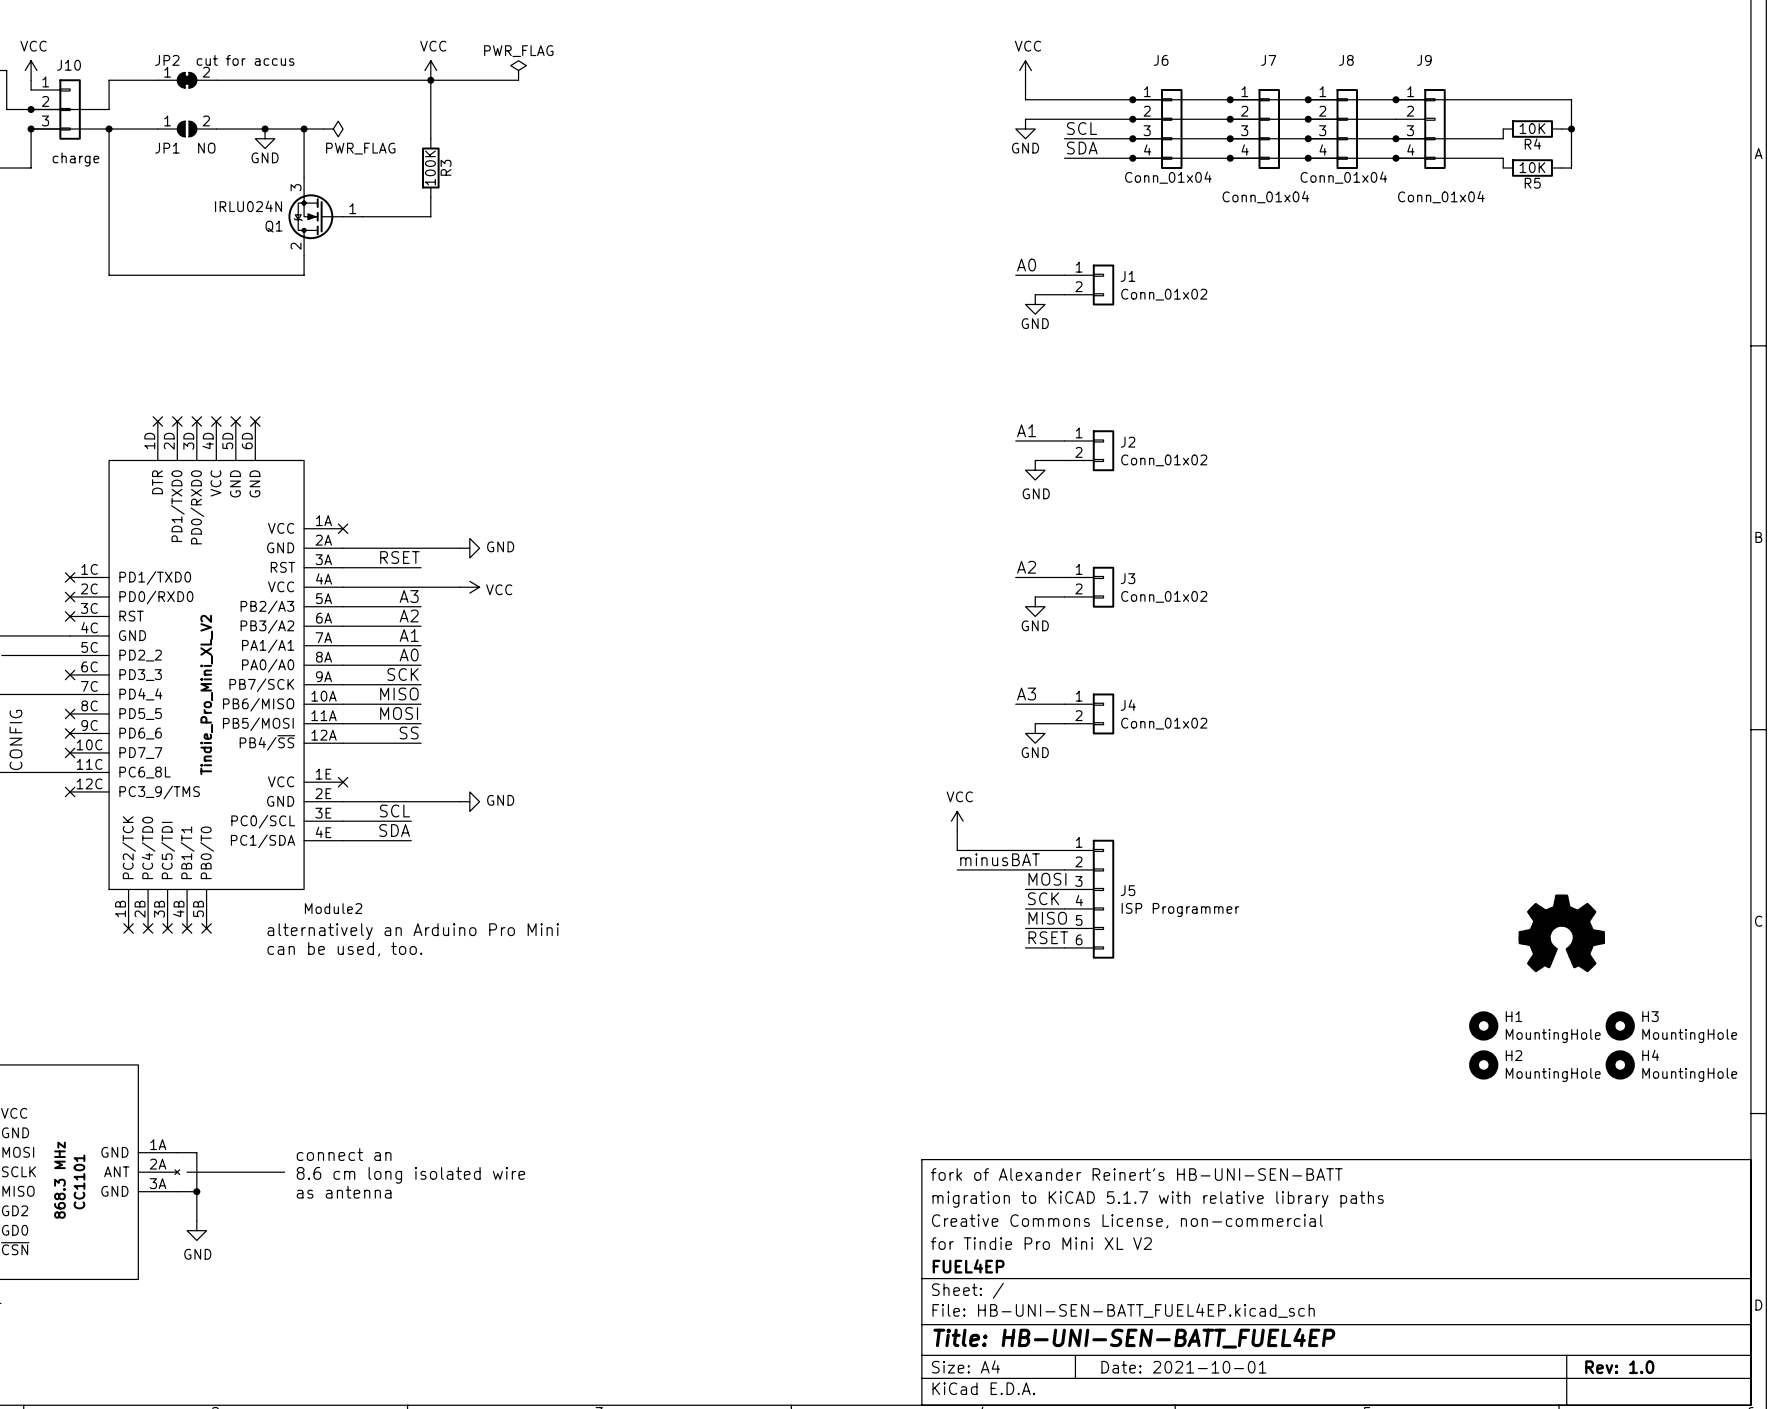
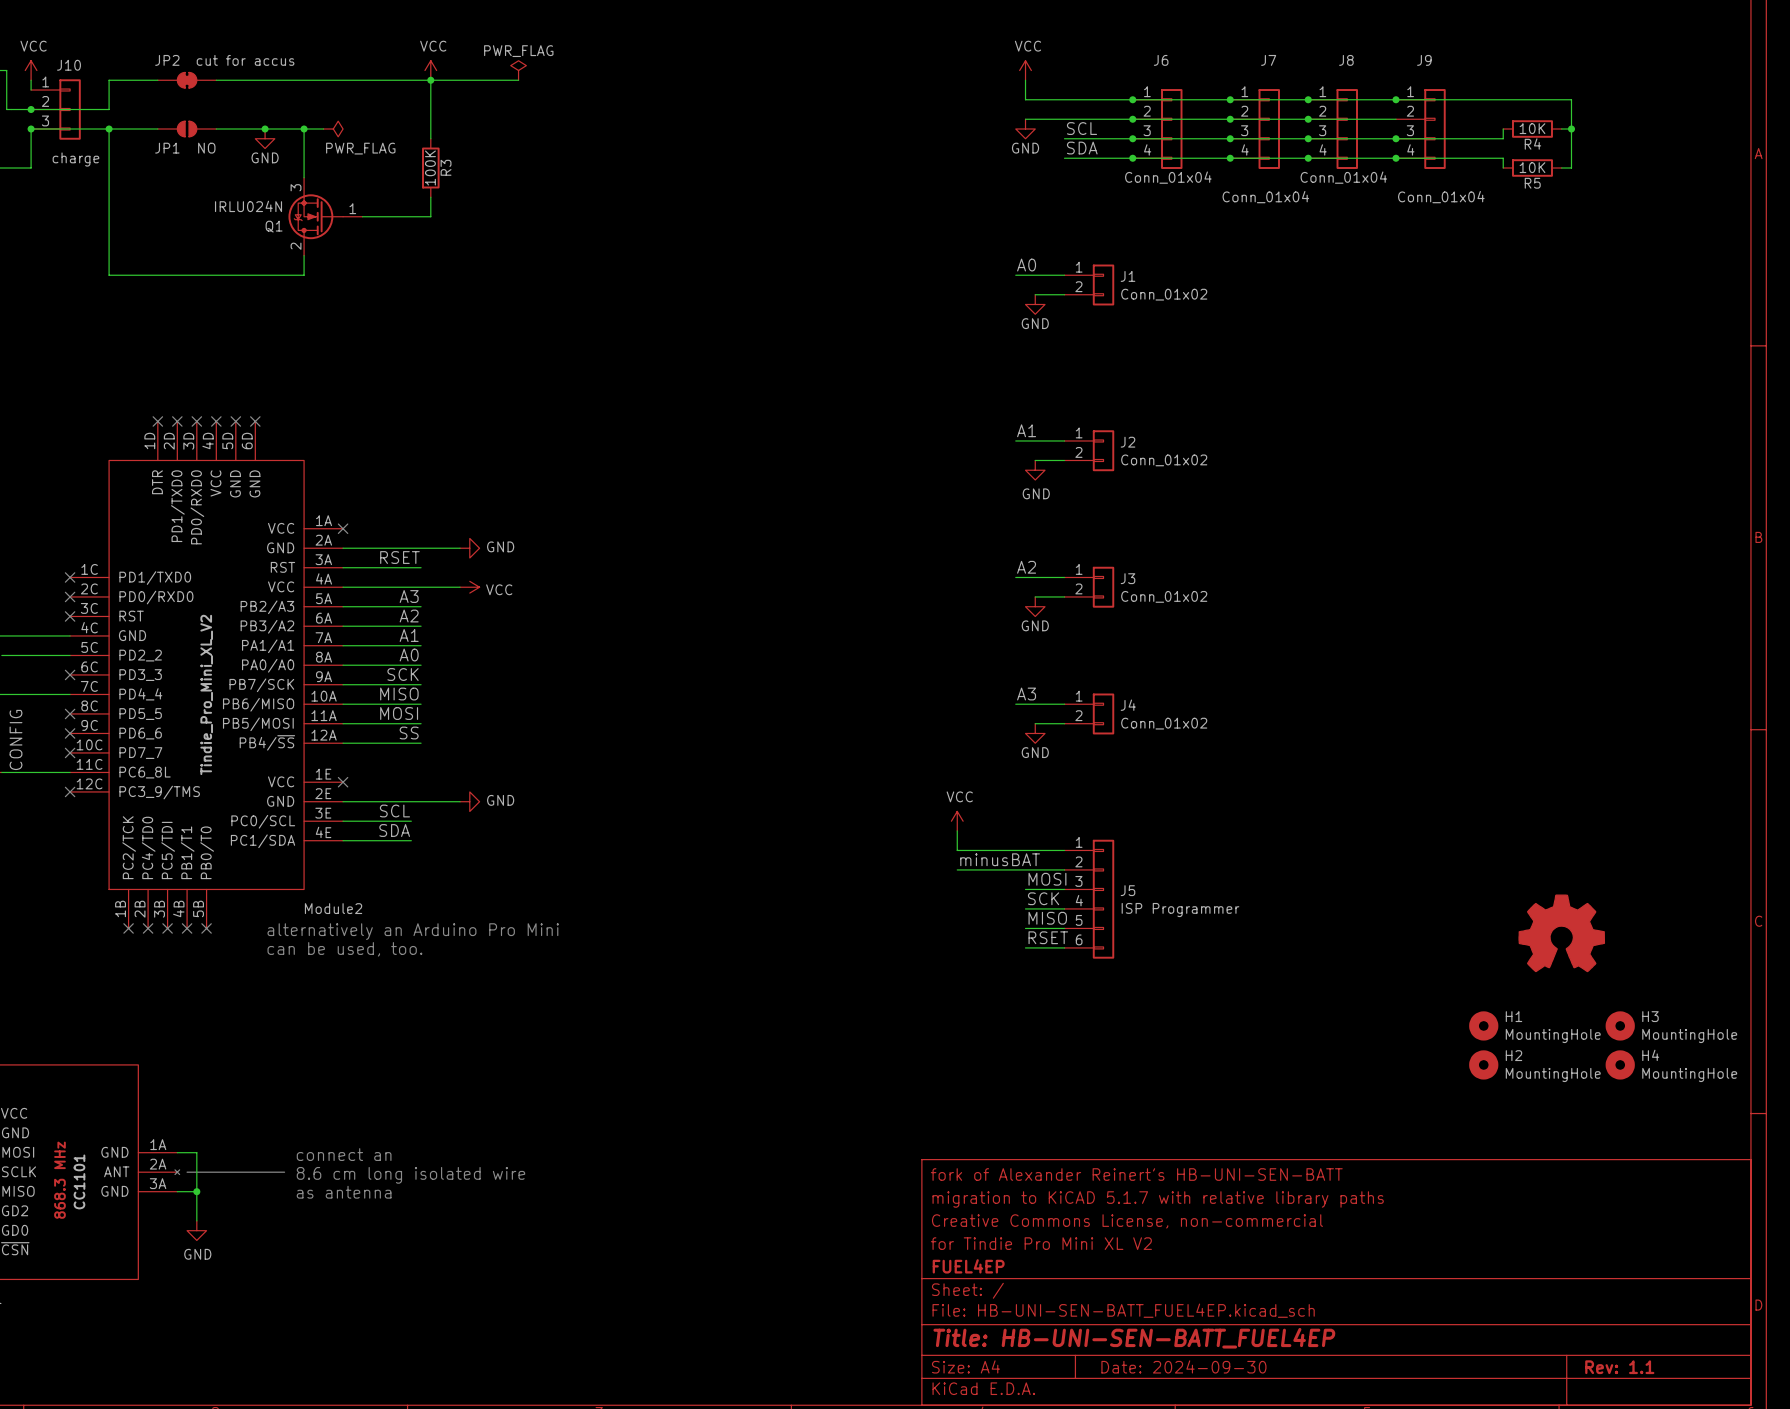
JP2 pin number: 1 (167, 72) -> none
JP2 pin number: 2 (206, 72) -> none
JP1 pin number: 1 (167, 120) -> none
JP1 pin number: 2 (206, 120) -> none
title block: Date: 2021-10-01 (1183, 1367) -> Date: 2024-09-30 (1183, 1366)
title block: Rev: 1.0 (1619, 1367) -> Rev: 1.1 (1619, 1367)

